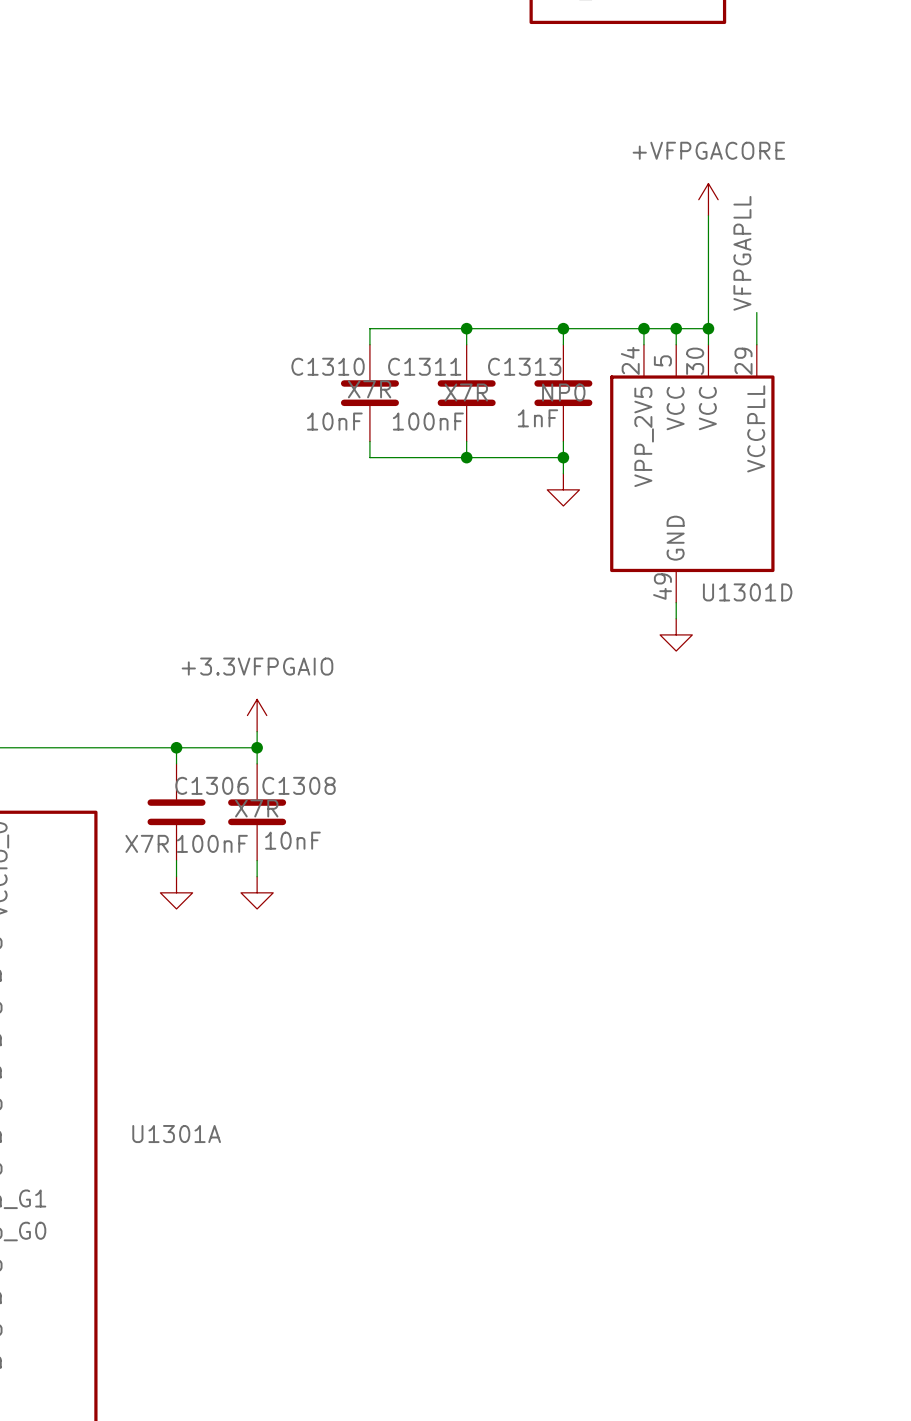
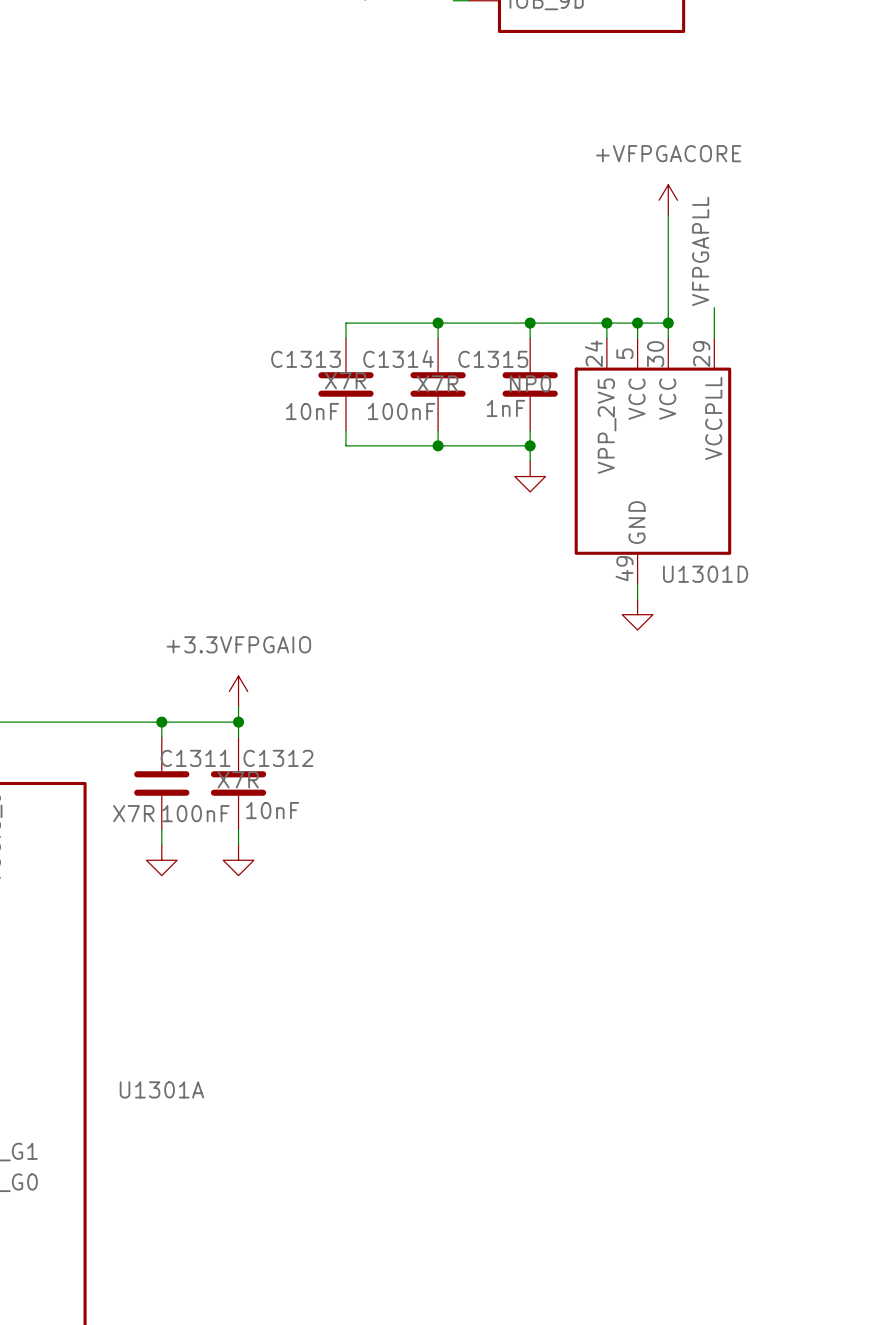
C1310 name: C1310 (328, 366) -> C1313 (306, 359)
C1311 name: C1311 (424, 366) -> C1314 (398, 358)
C1313 name: C1313 (524, 366) -> C1315 (493, 359)
C1306 name: C1306 (211, 785) -> C1311 (195, 758)
C1308 name: C1308 (299, 785) -> C1312 (278, 758)

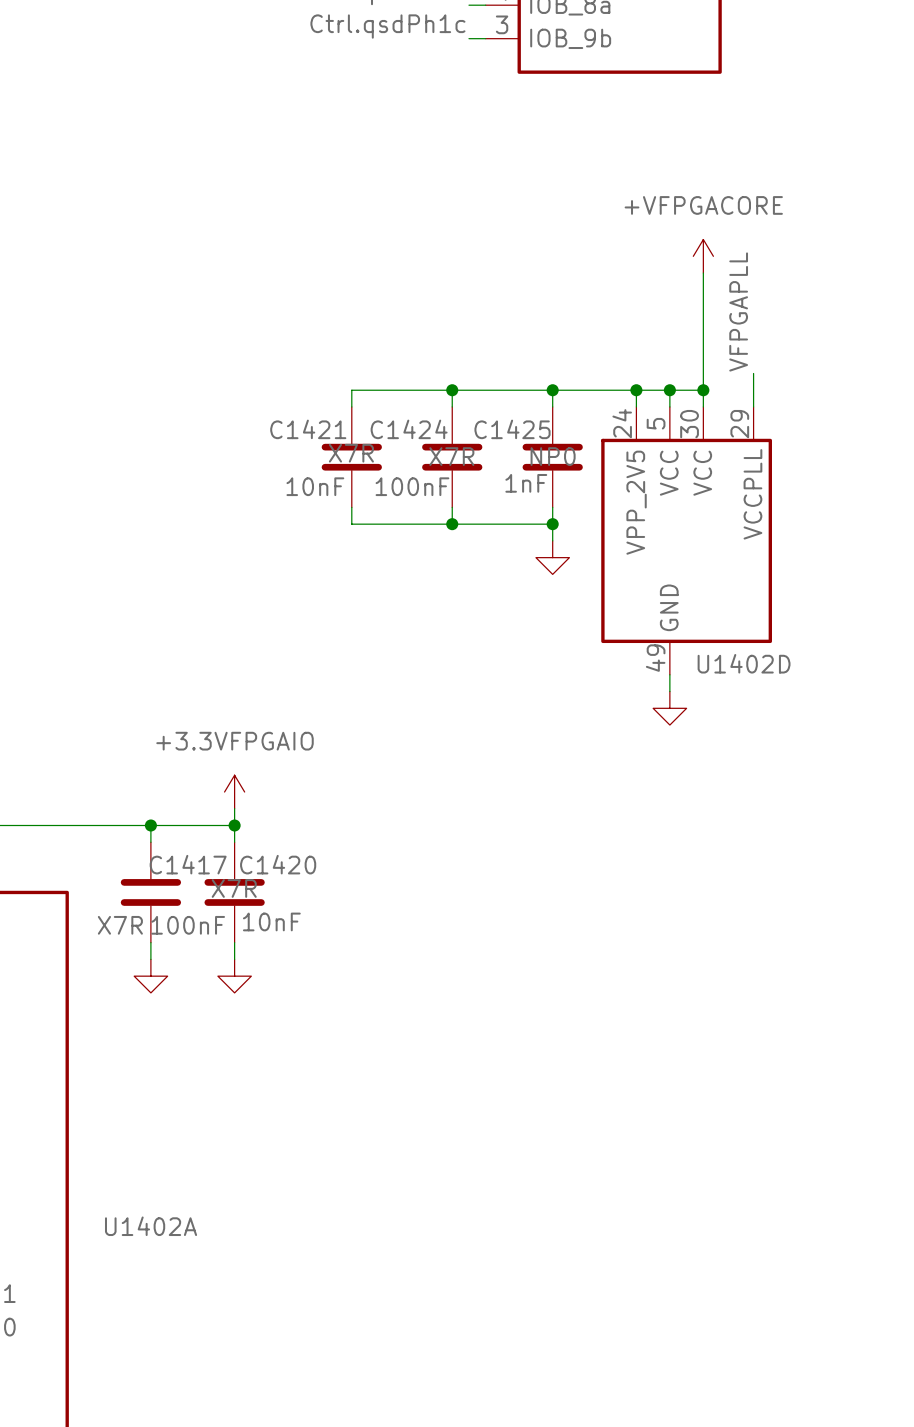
C1314 name: C1314 (398, 358) -> C1424 (409, 429)
C1313 name: C1313 (306, 359) -> C1421 (308, 429)
C1315 name: C1315 (493, 359) -> C1425 (512, 429)
U1301D name: U1301D (705, 574) -> U1402D (744, 663)
C1311 name: C1311 (195, 758) -> C1417 (188, 864)
C1312 name: C1312 (278, 758) -> C1420 (278, 864)
U1301A name: U1301A (161, 1089) -> U1402A (151, 1226)

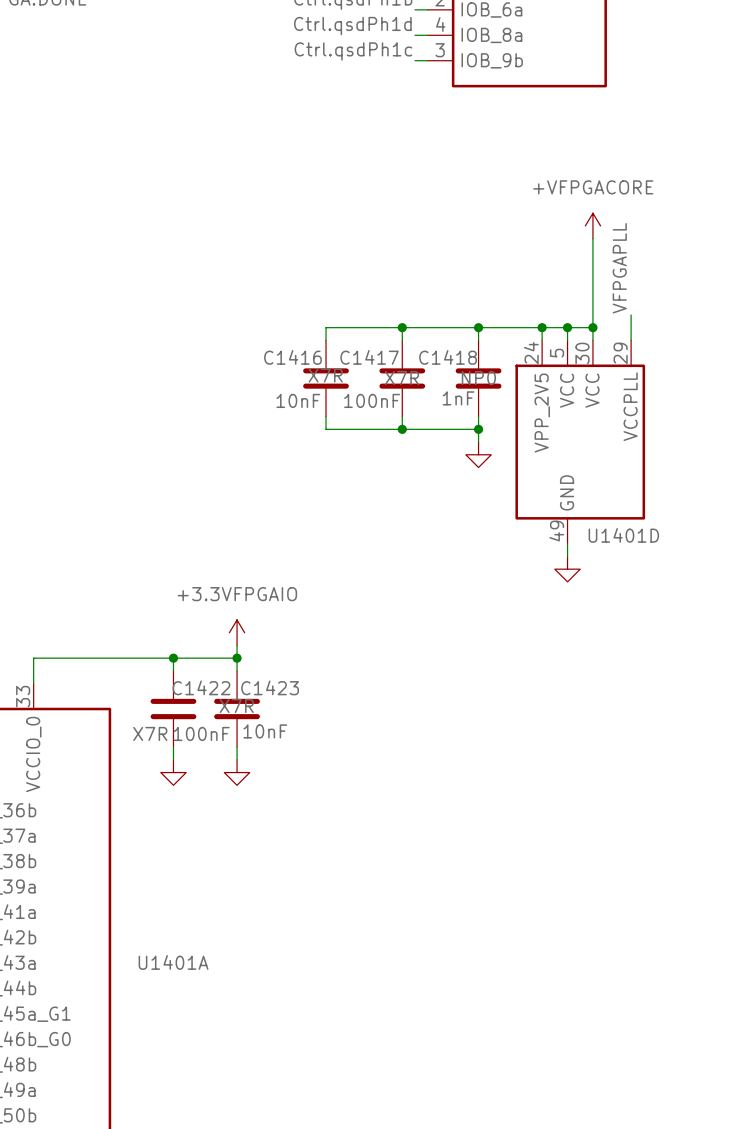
C1421 name: C1421 (308, 429) -> C1416 (292, 357)
C1424 name: C1424 (409, 429) -> C1417 (369, 357)
C1425 name: C1425 (512, 429) -> C1418 (448, 357)
U1402D name: U1402D (744, 663) -> U1401D (623, 535)
C1417 name: C1417 (188, 864) -> C1422 (201, 687)
C1420 name: C1420 (278, 864) -> C1423 (270, 687)
U1402A name: U1402A (151, 1226) -> U1401A (173, 962)

